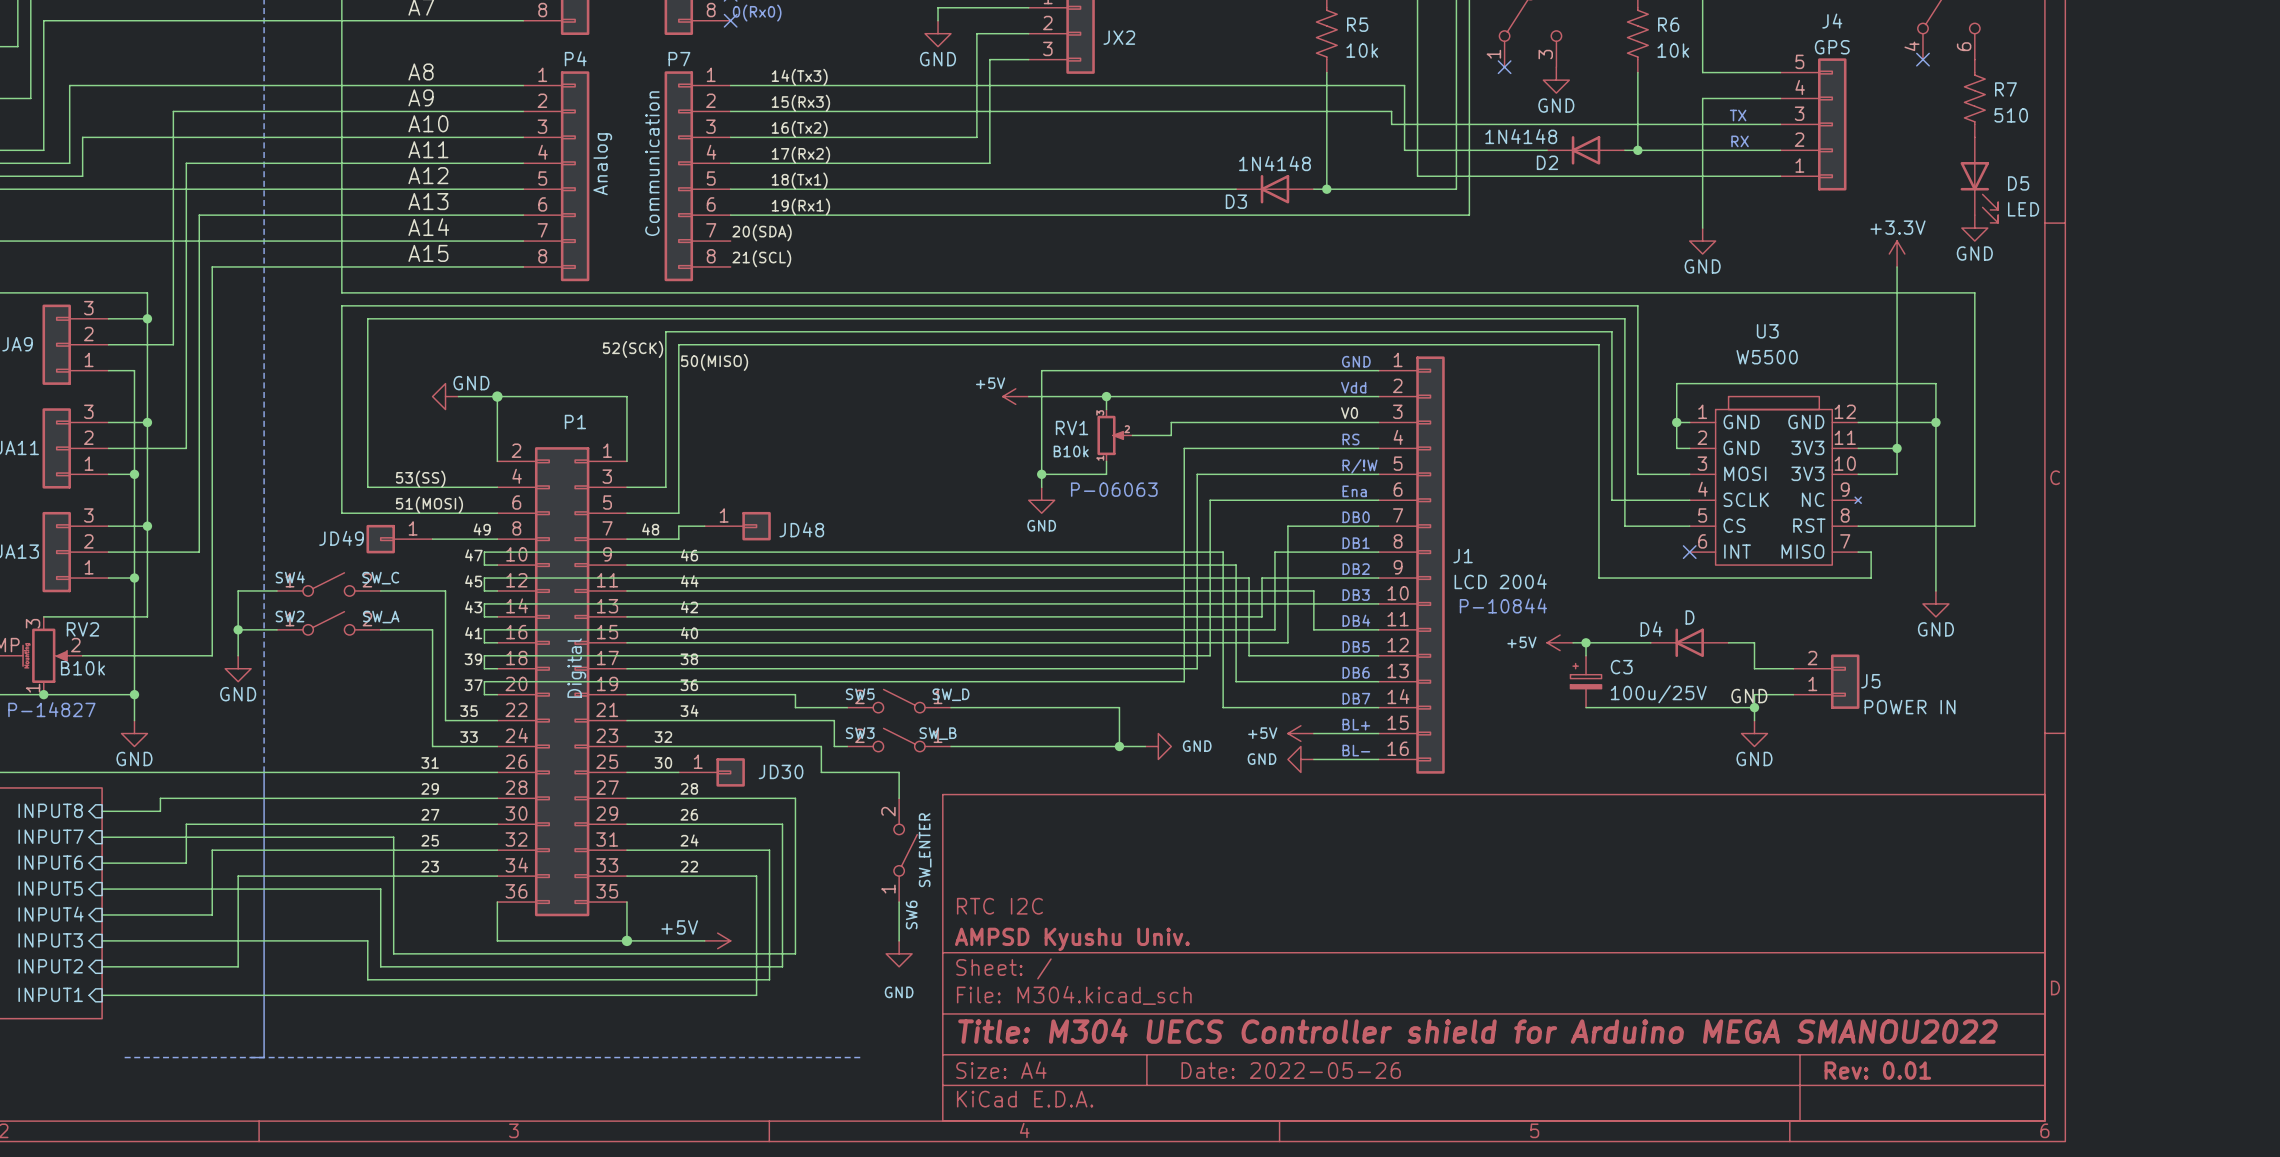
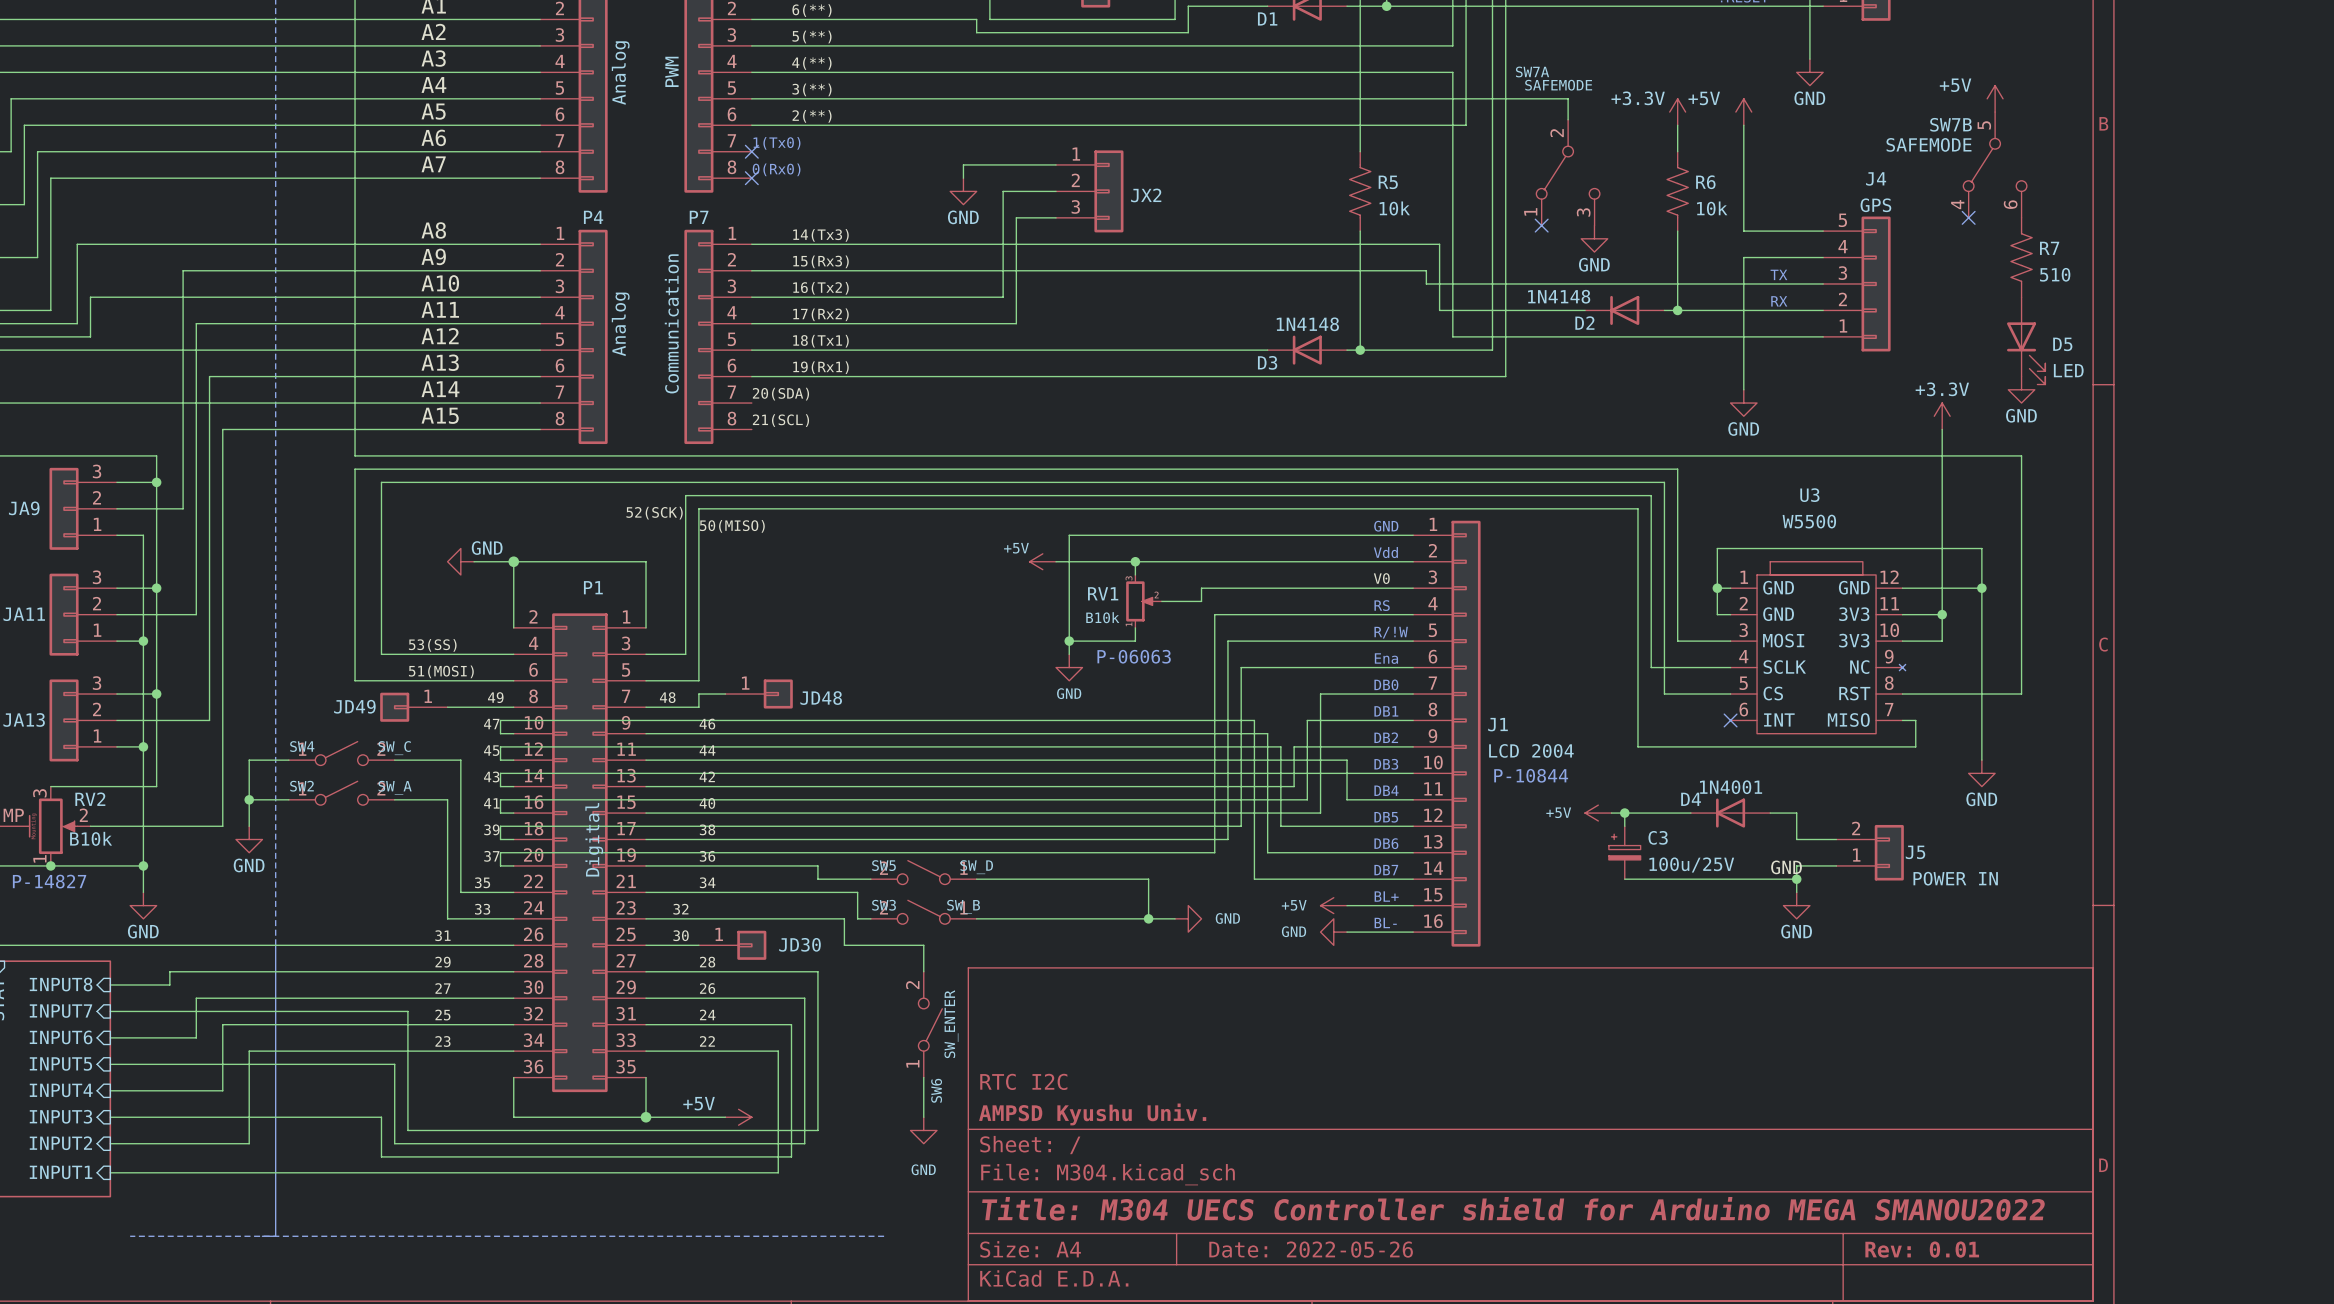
D4 value: D (1690, 617) -> 1N4001 (1731, 787)

